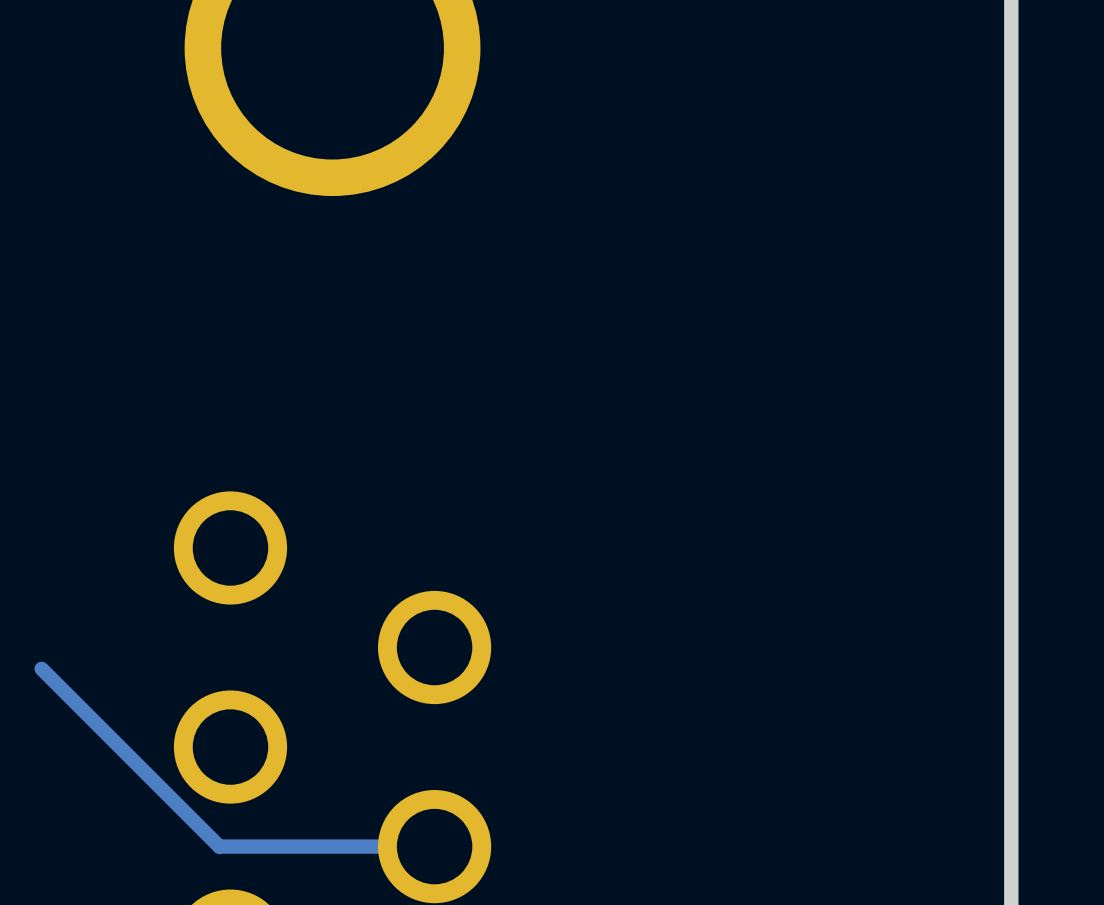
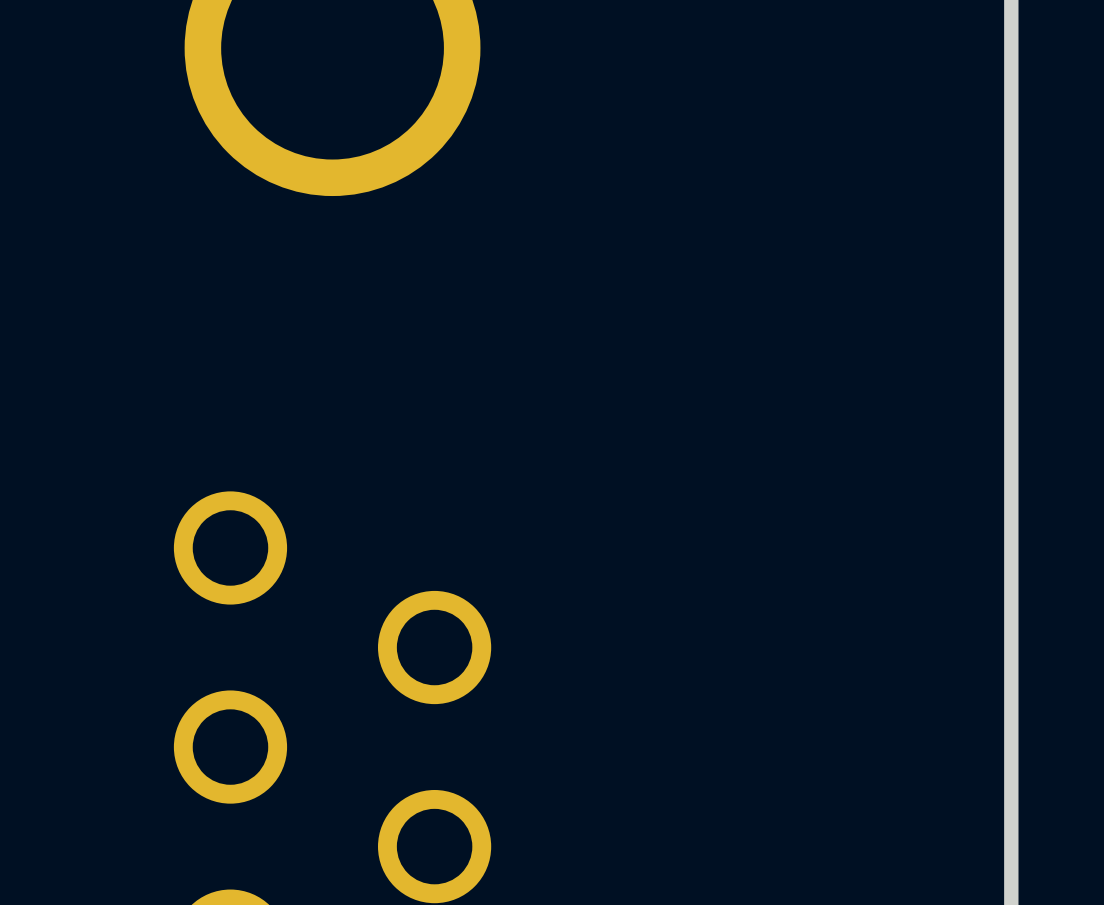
track: (41, 668) (219, 846) (434, 846) -> none

